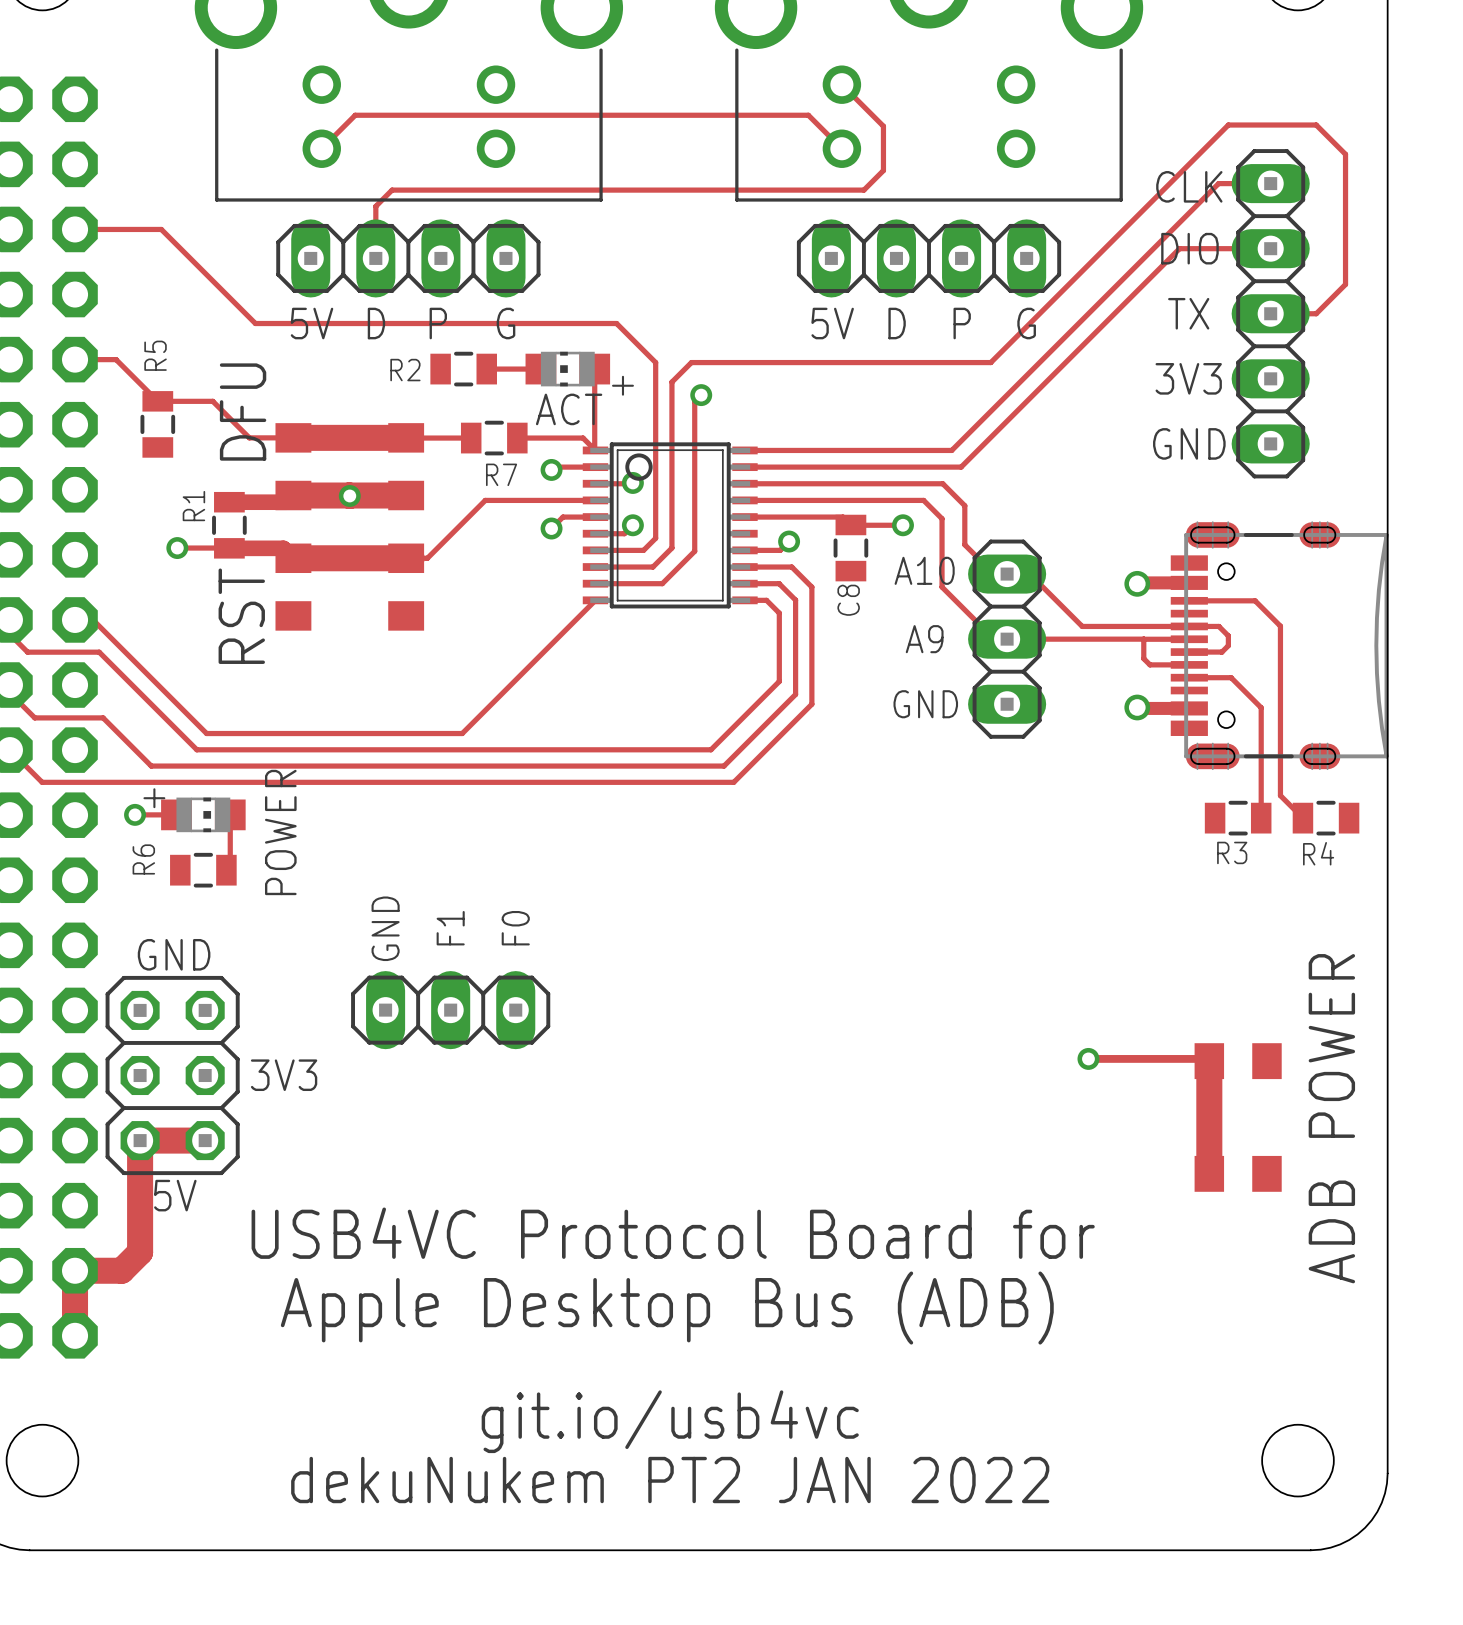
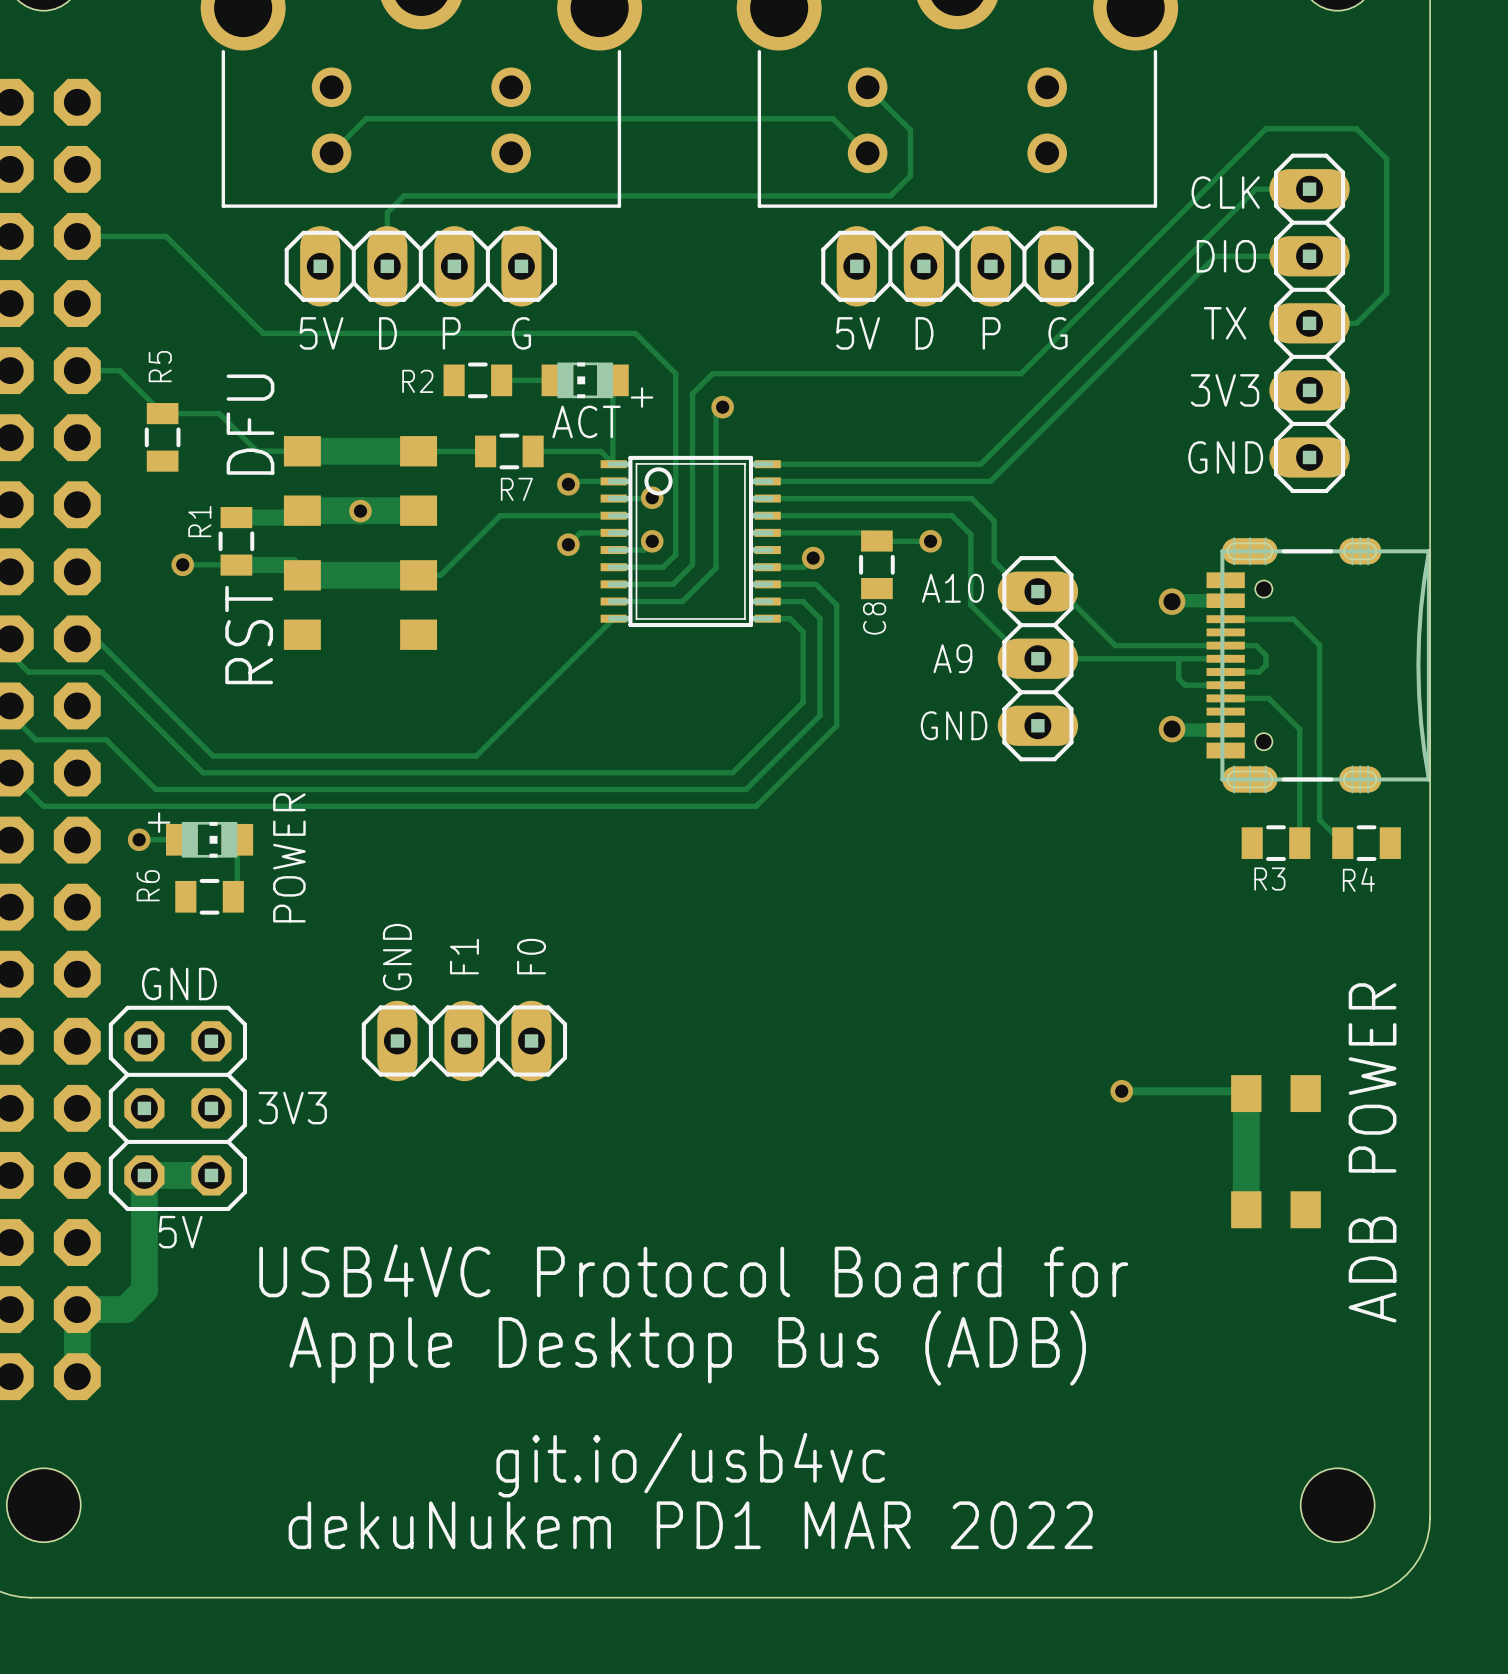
text: dekuNukem PT2 JAN 2022 (670, 1480) -> dekuNukem PD1 MAR 2022 (690, 1525)

